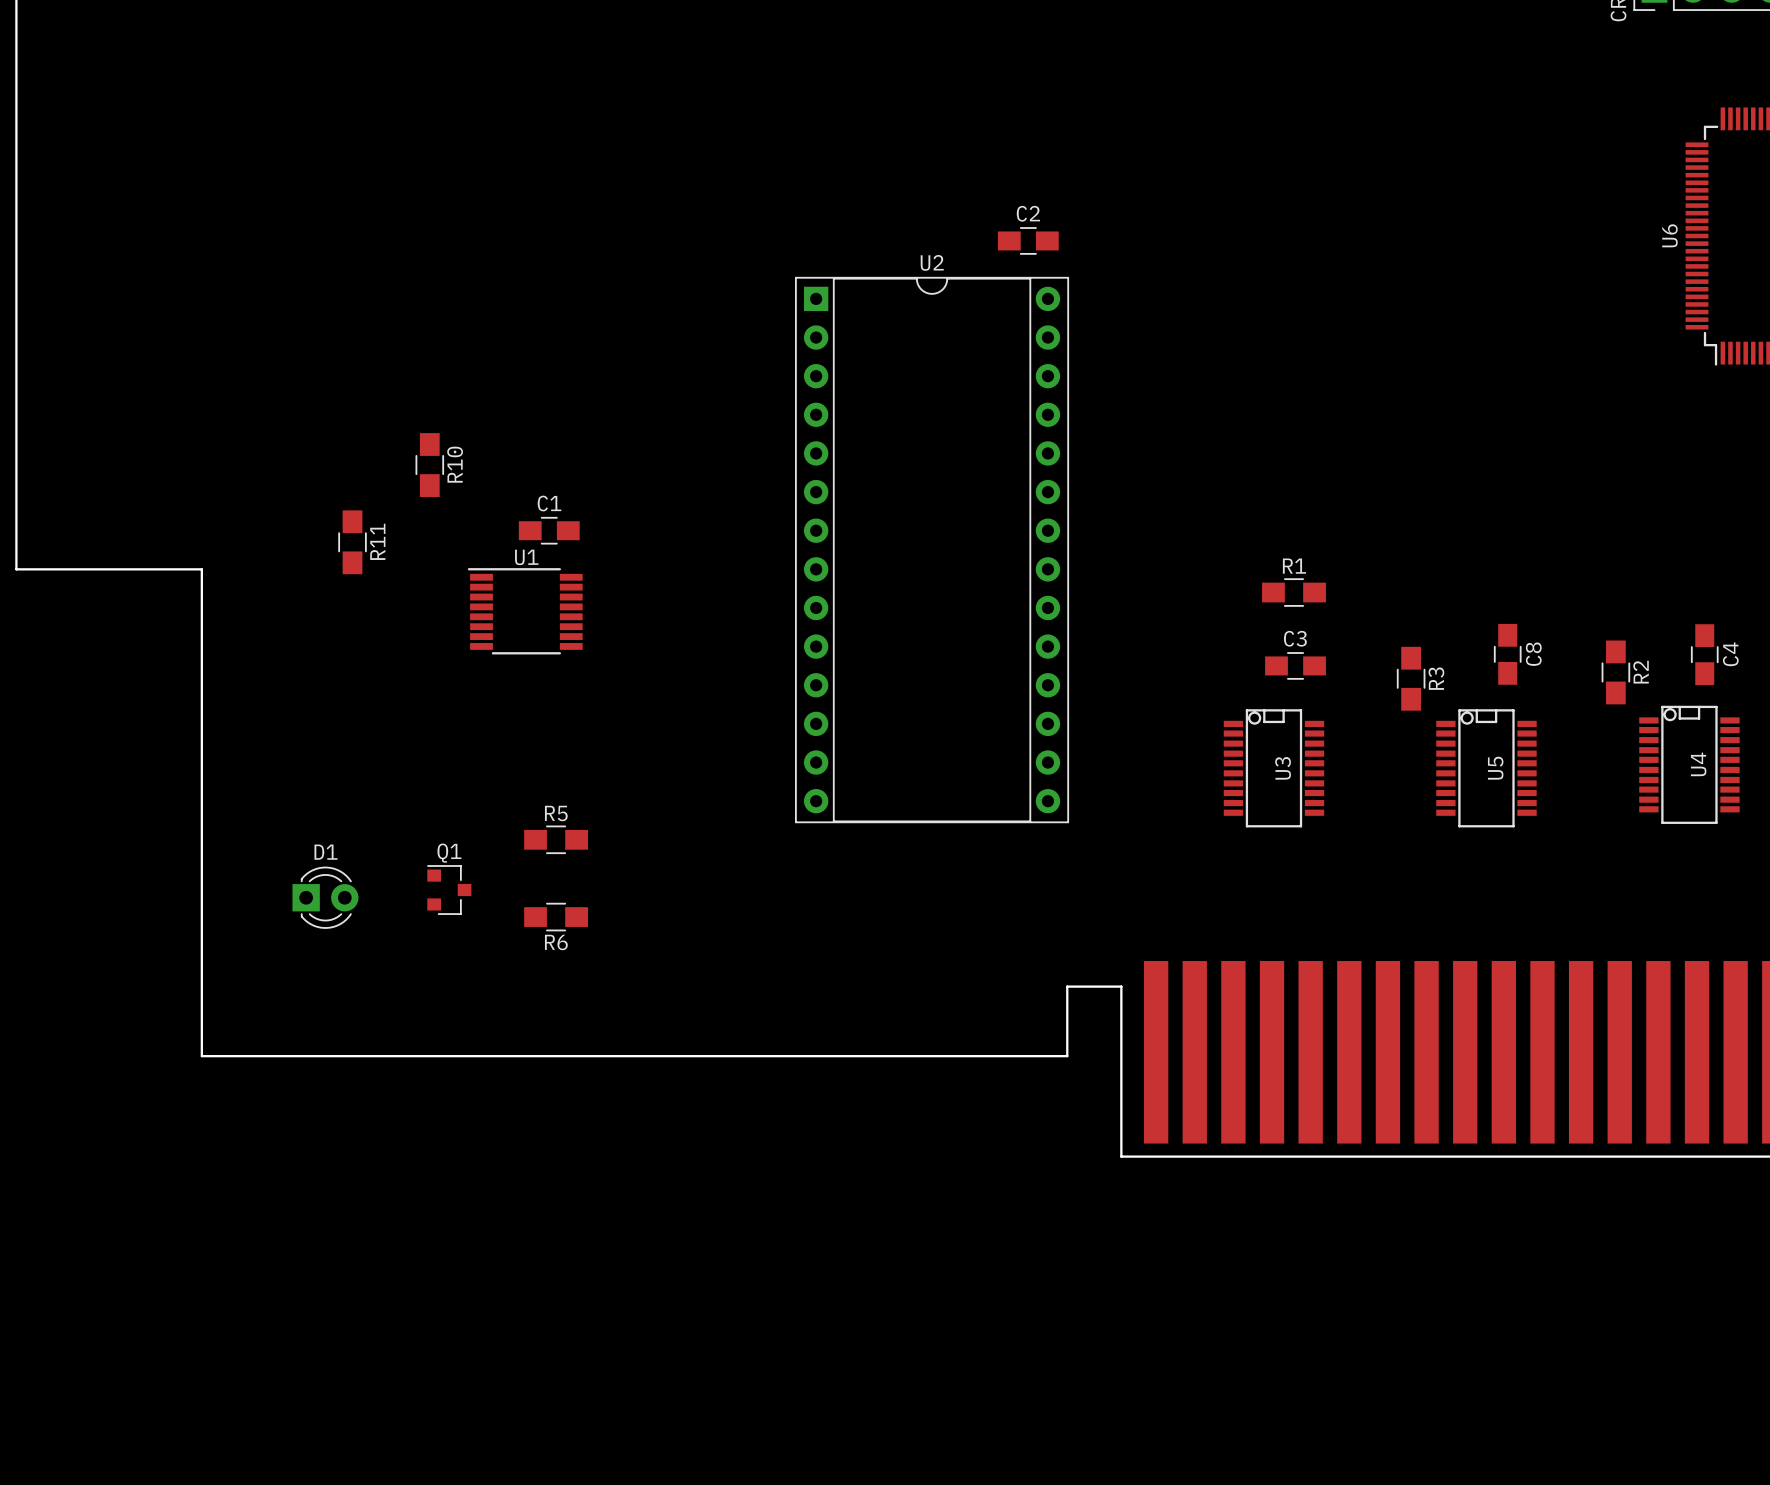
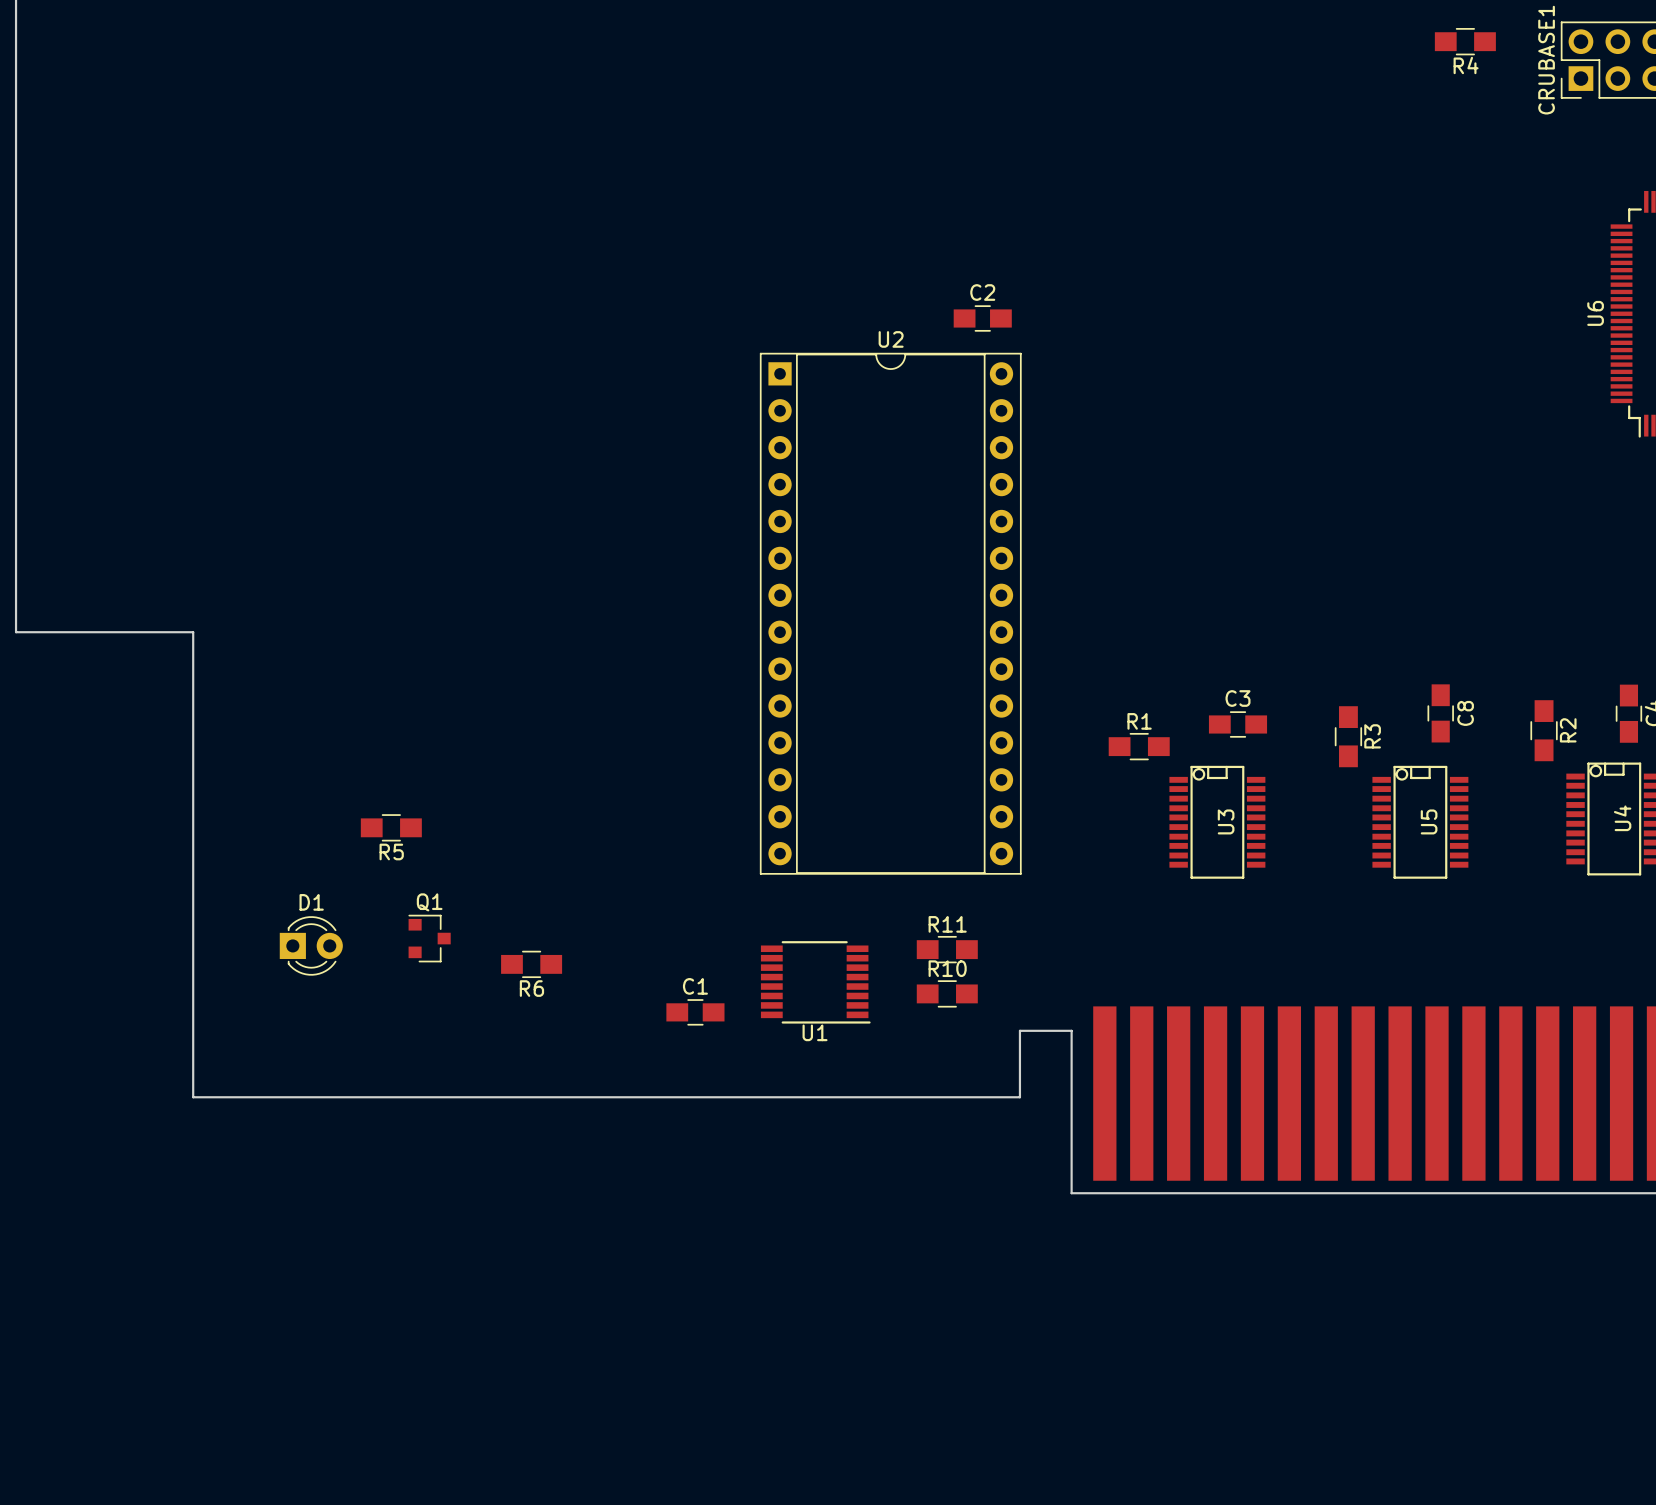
R10 name position: R10 (455, 464) -> R10 (947, 968)
R10 rotation: 0° (429, 465) -> 90° clockwise (947, 993)
R10 position: (429, 465) -> (947, 993)
C1 position: (549, 530) -> (695, 1012)
R11 name position: R11 (377, 541) -> R11 (947, 924)
R11 rotation: 0° (352, 542) -> 90° clockwise (947, 949)
R11 position: (352, 542) -> (947, 949)
R1 position: (1294, 592) -> (1139, 746)
U1 rotation: 0° (525, 611) -> 180° (815, 982)
U1 position: (525, 611) -> (815, 982)
R5 name position: R5 (556, 813) -> R5 (391, 851)
R5 position: (556, 839) -> (391, 827)

